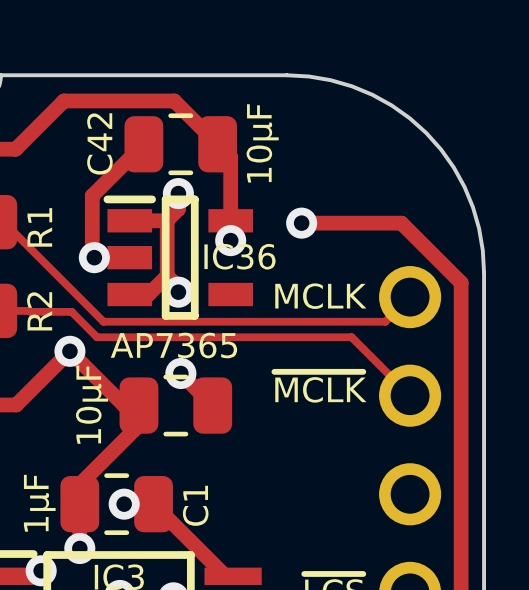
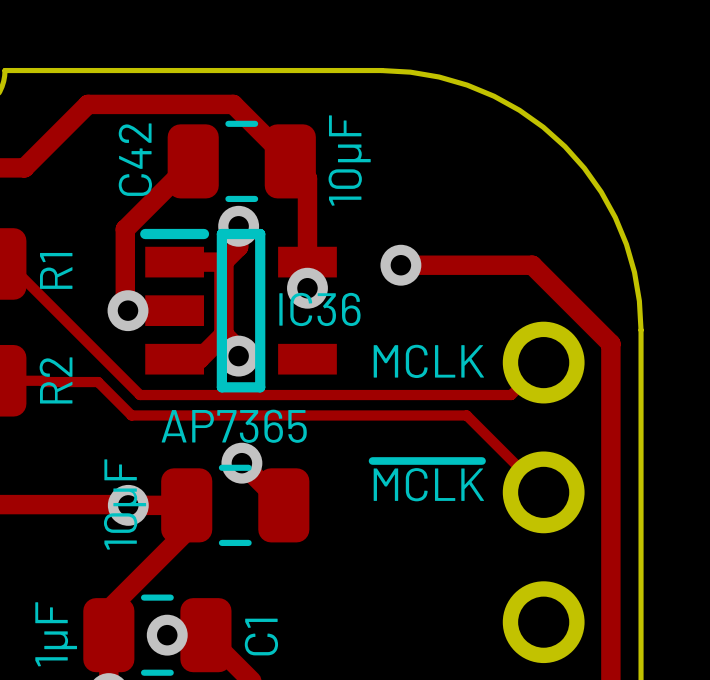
via position: (69, 351) -> (128, 505)
track: (16, 404) (69, 351) (124, 405) -> (25, 504) (167, 505)

